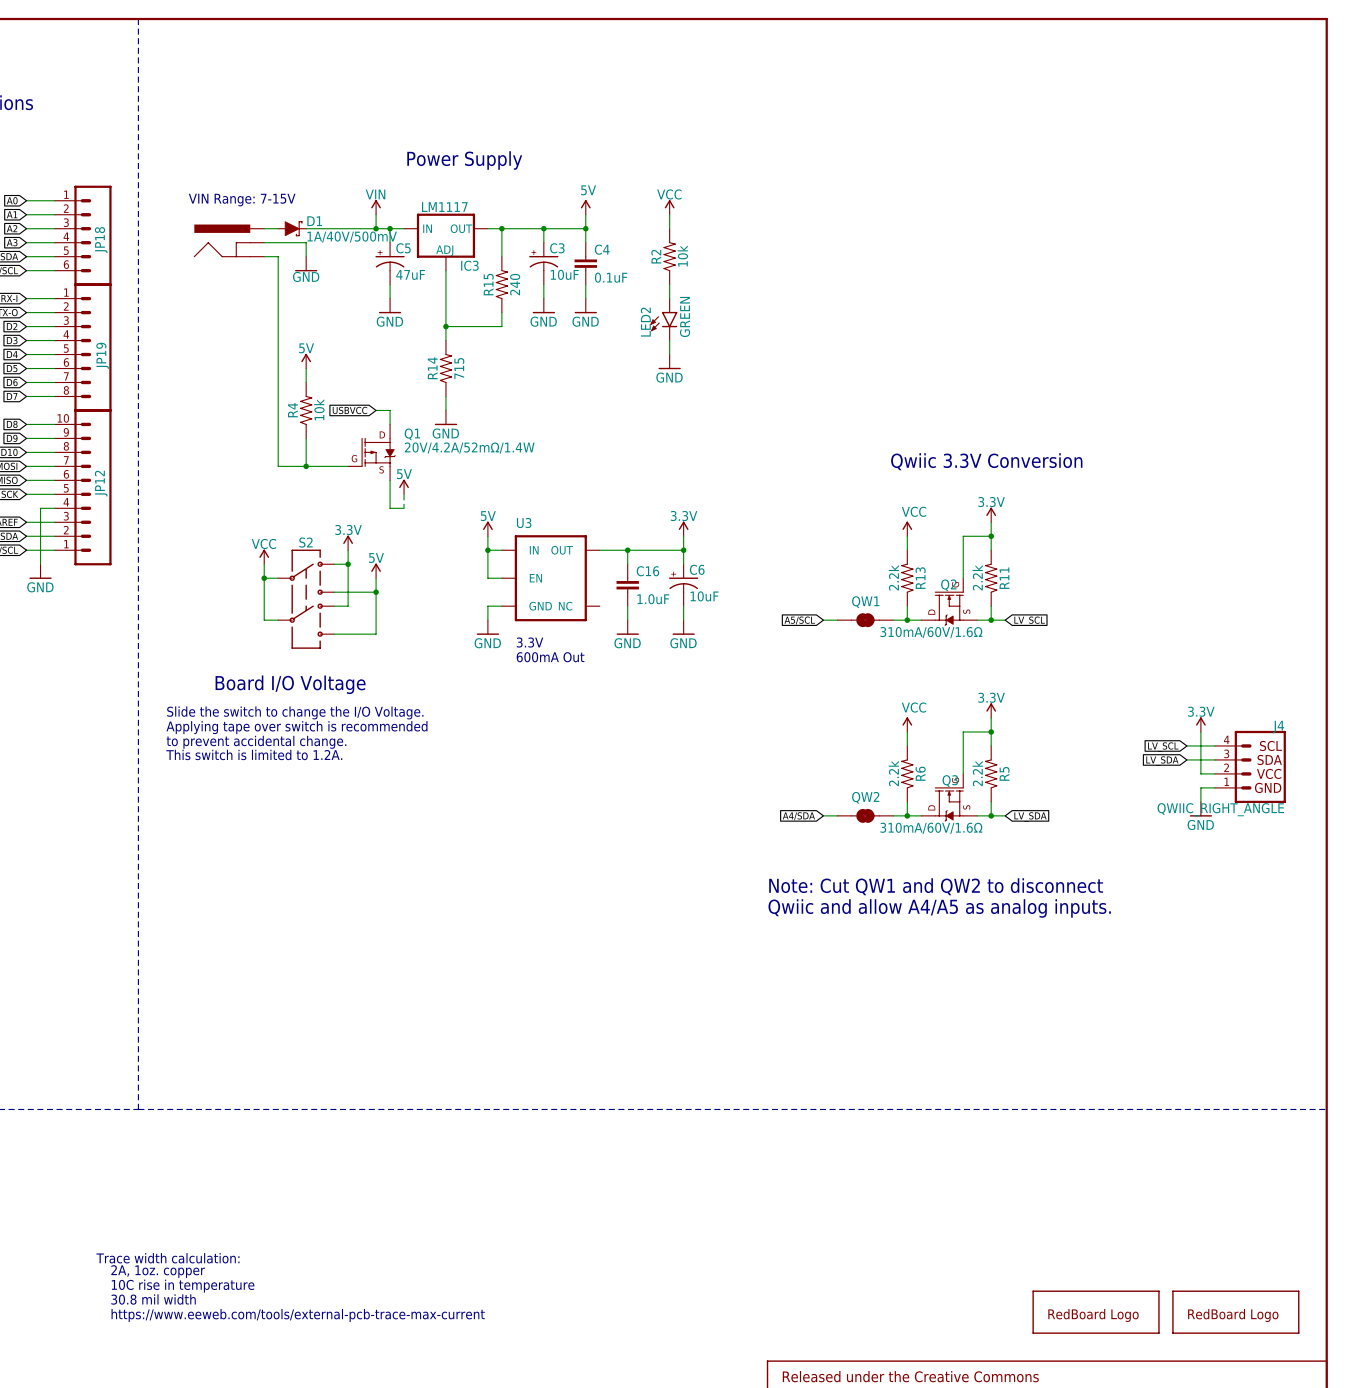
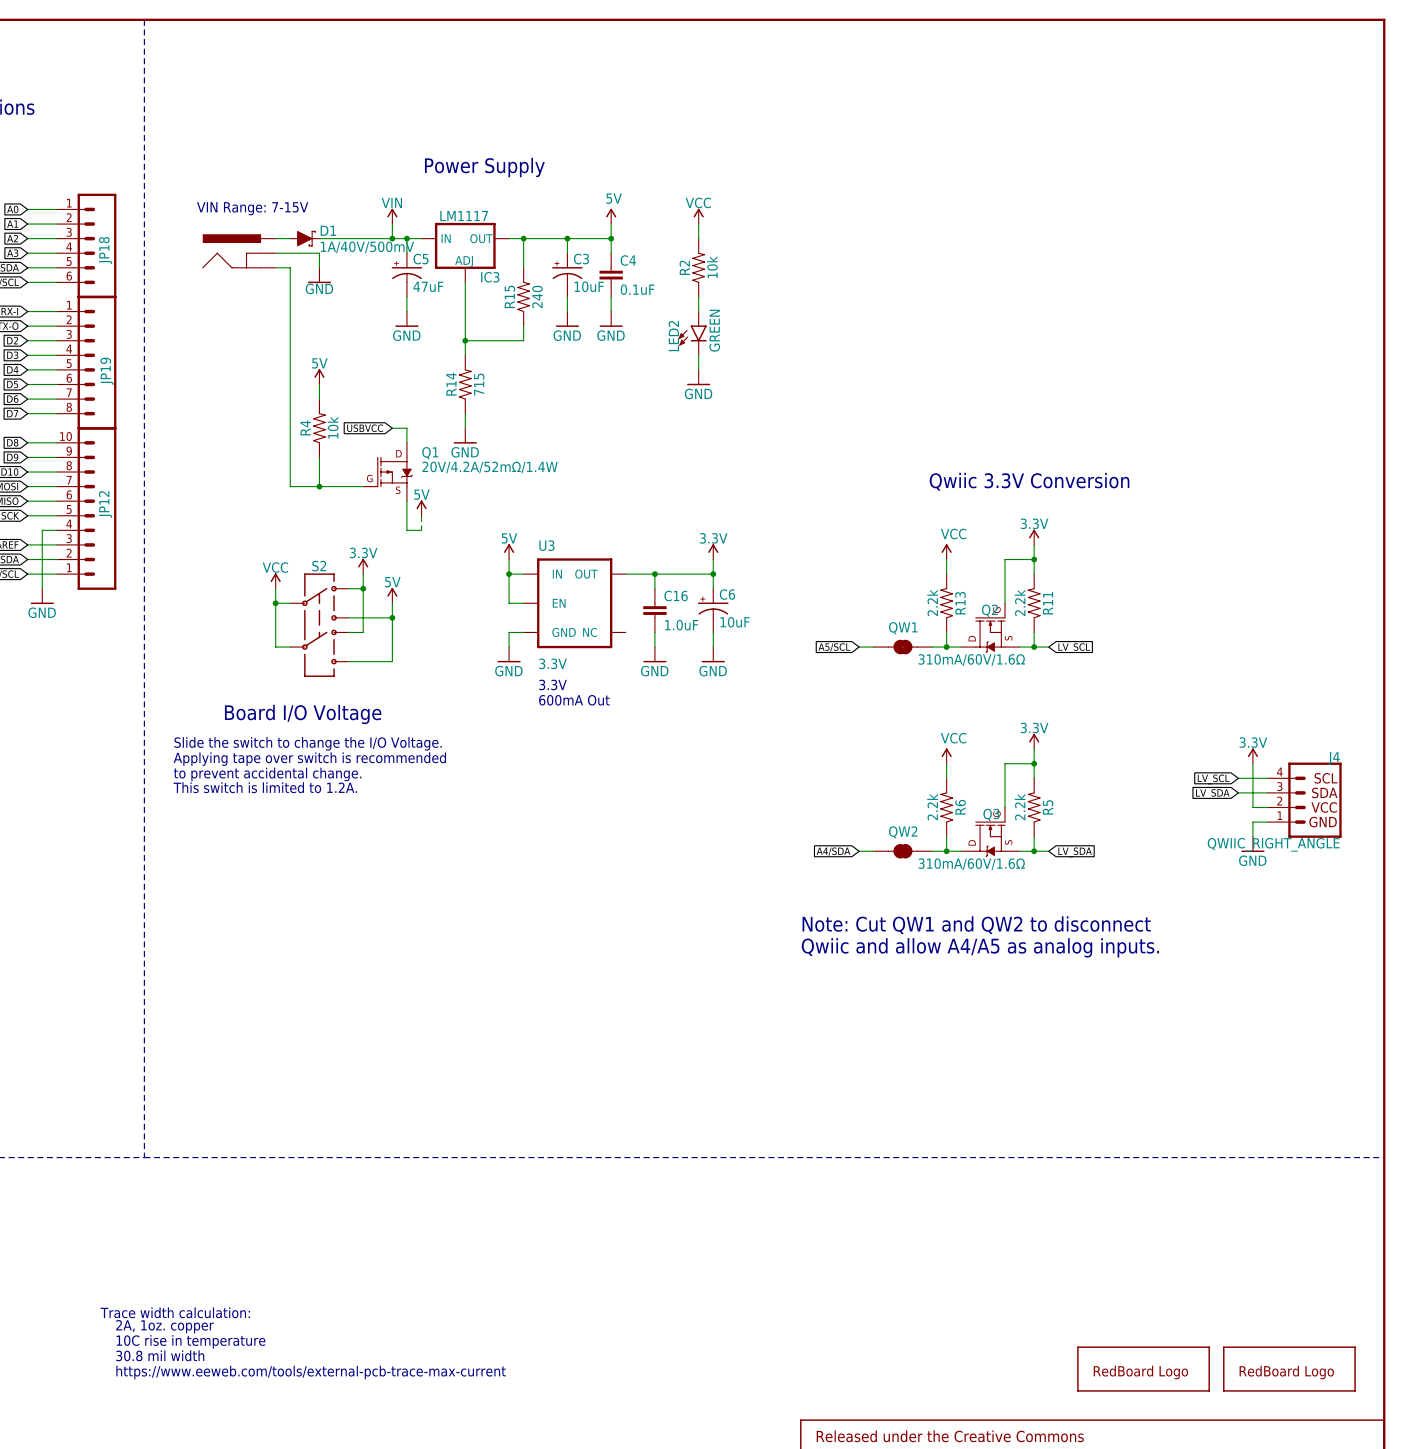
U3 value: none -> 3.3V (552, 663)
text: 3.3V (530, 642) -> none
text: 600mA Out (550, 657) -> 3.3V (552, 684)
text: none -> 600mA Out (574, 700)

